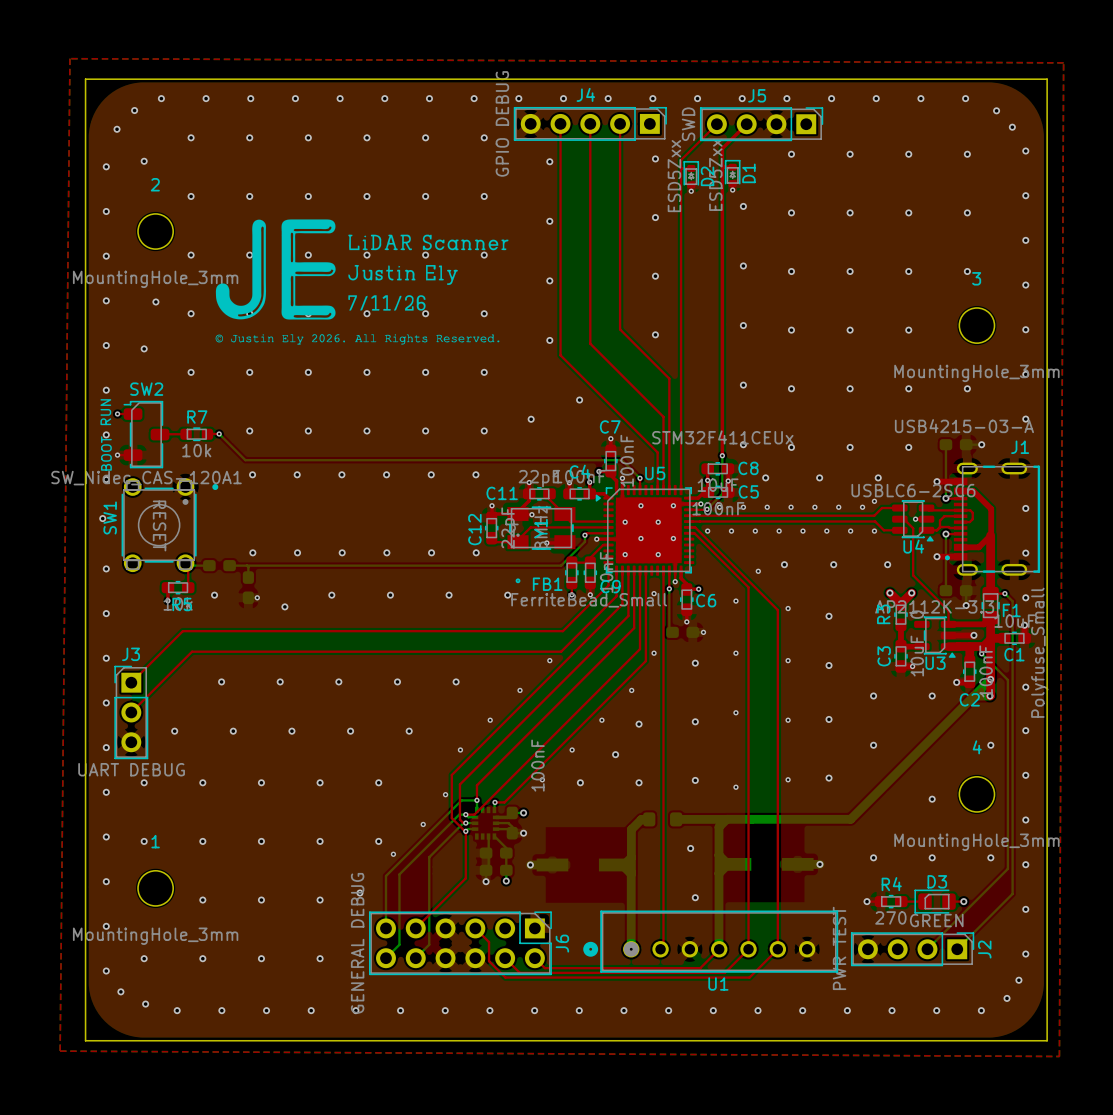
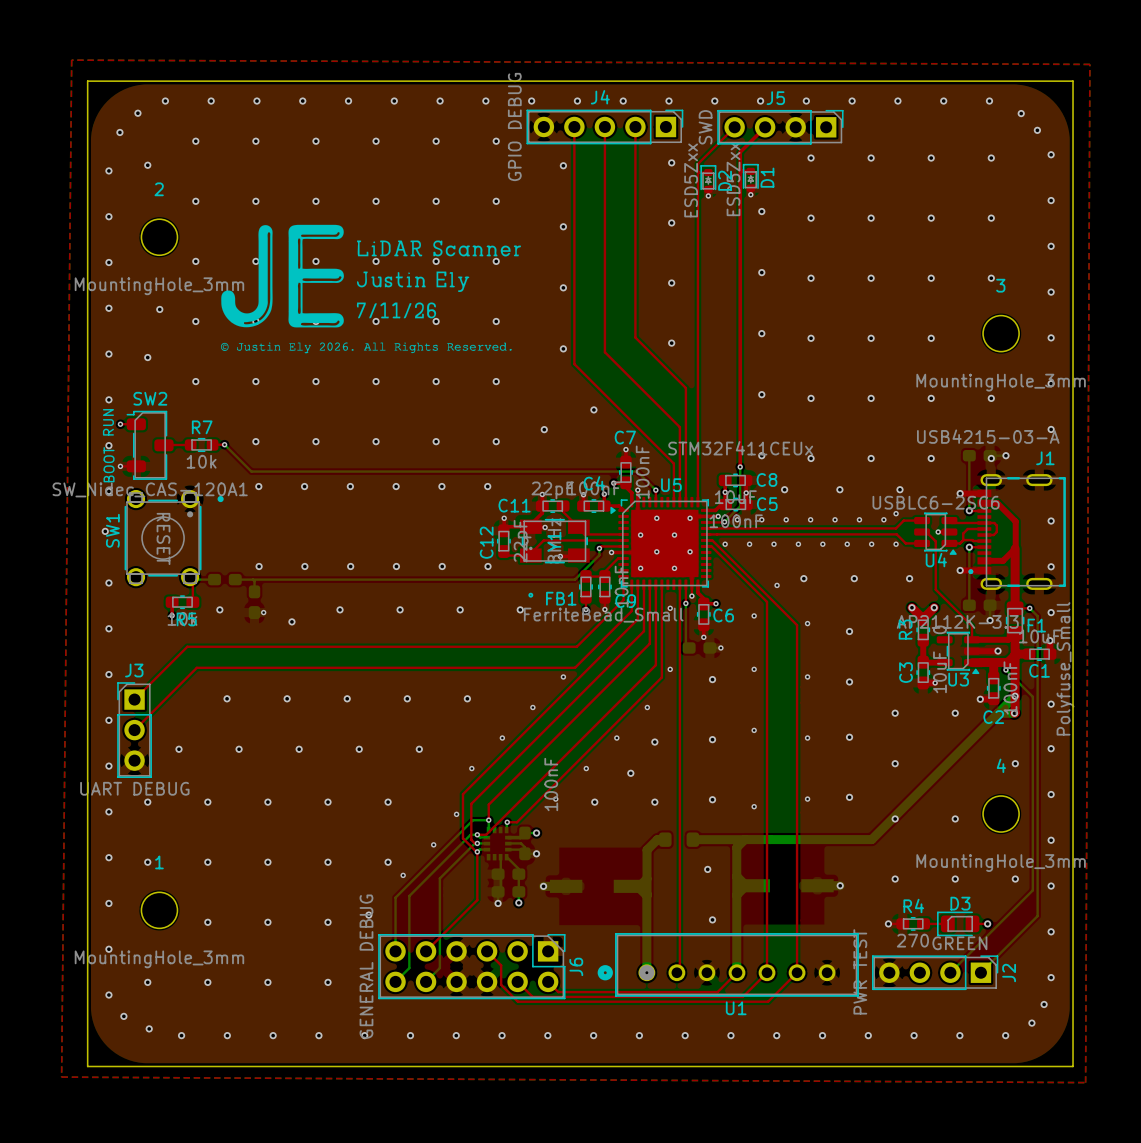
via: none -> (991, 458)
via: none -> (895, 818)

